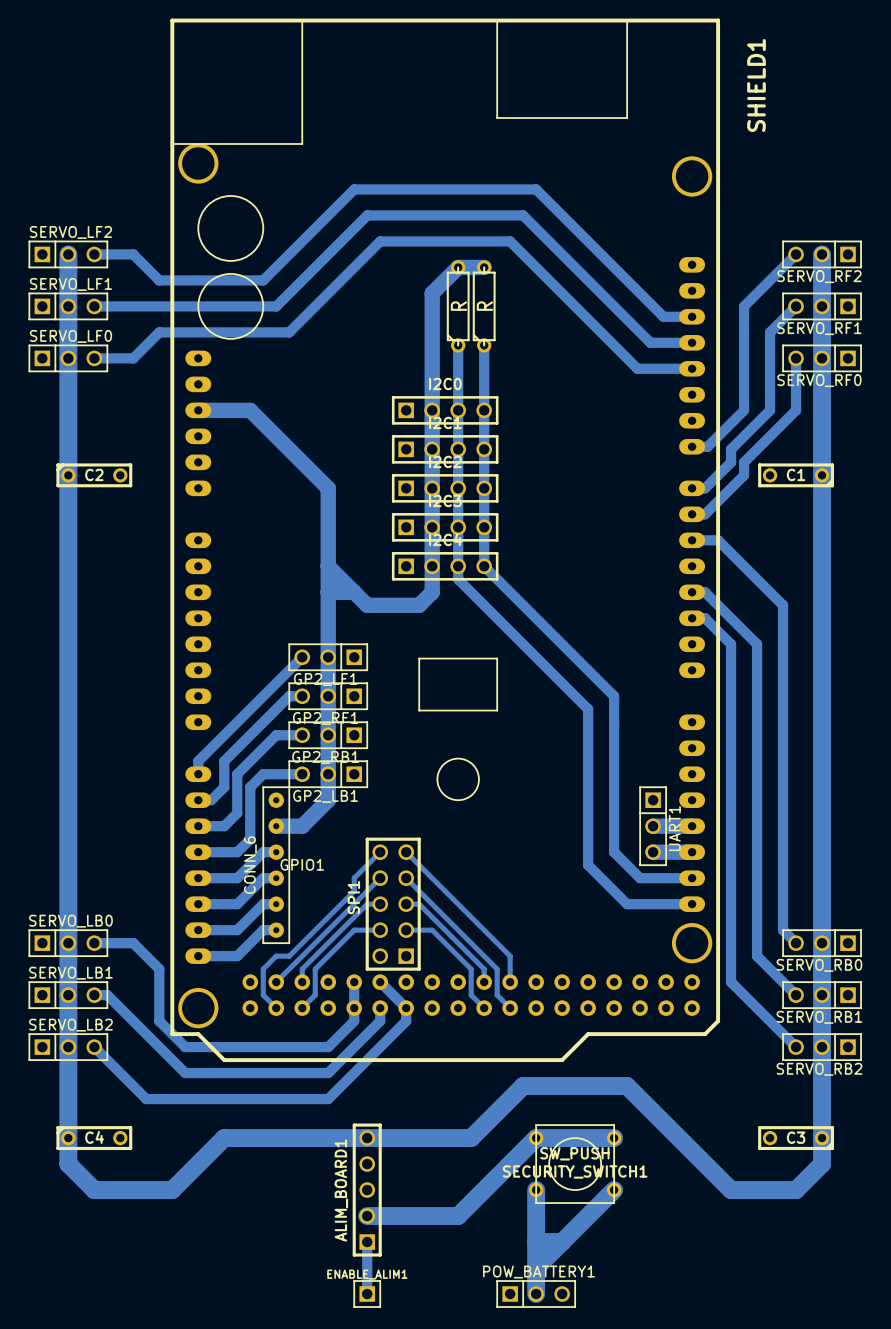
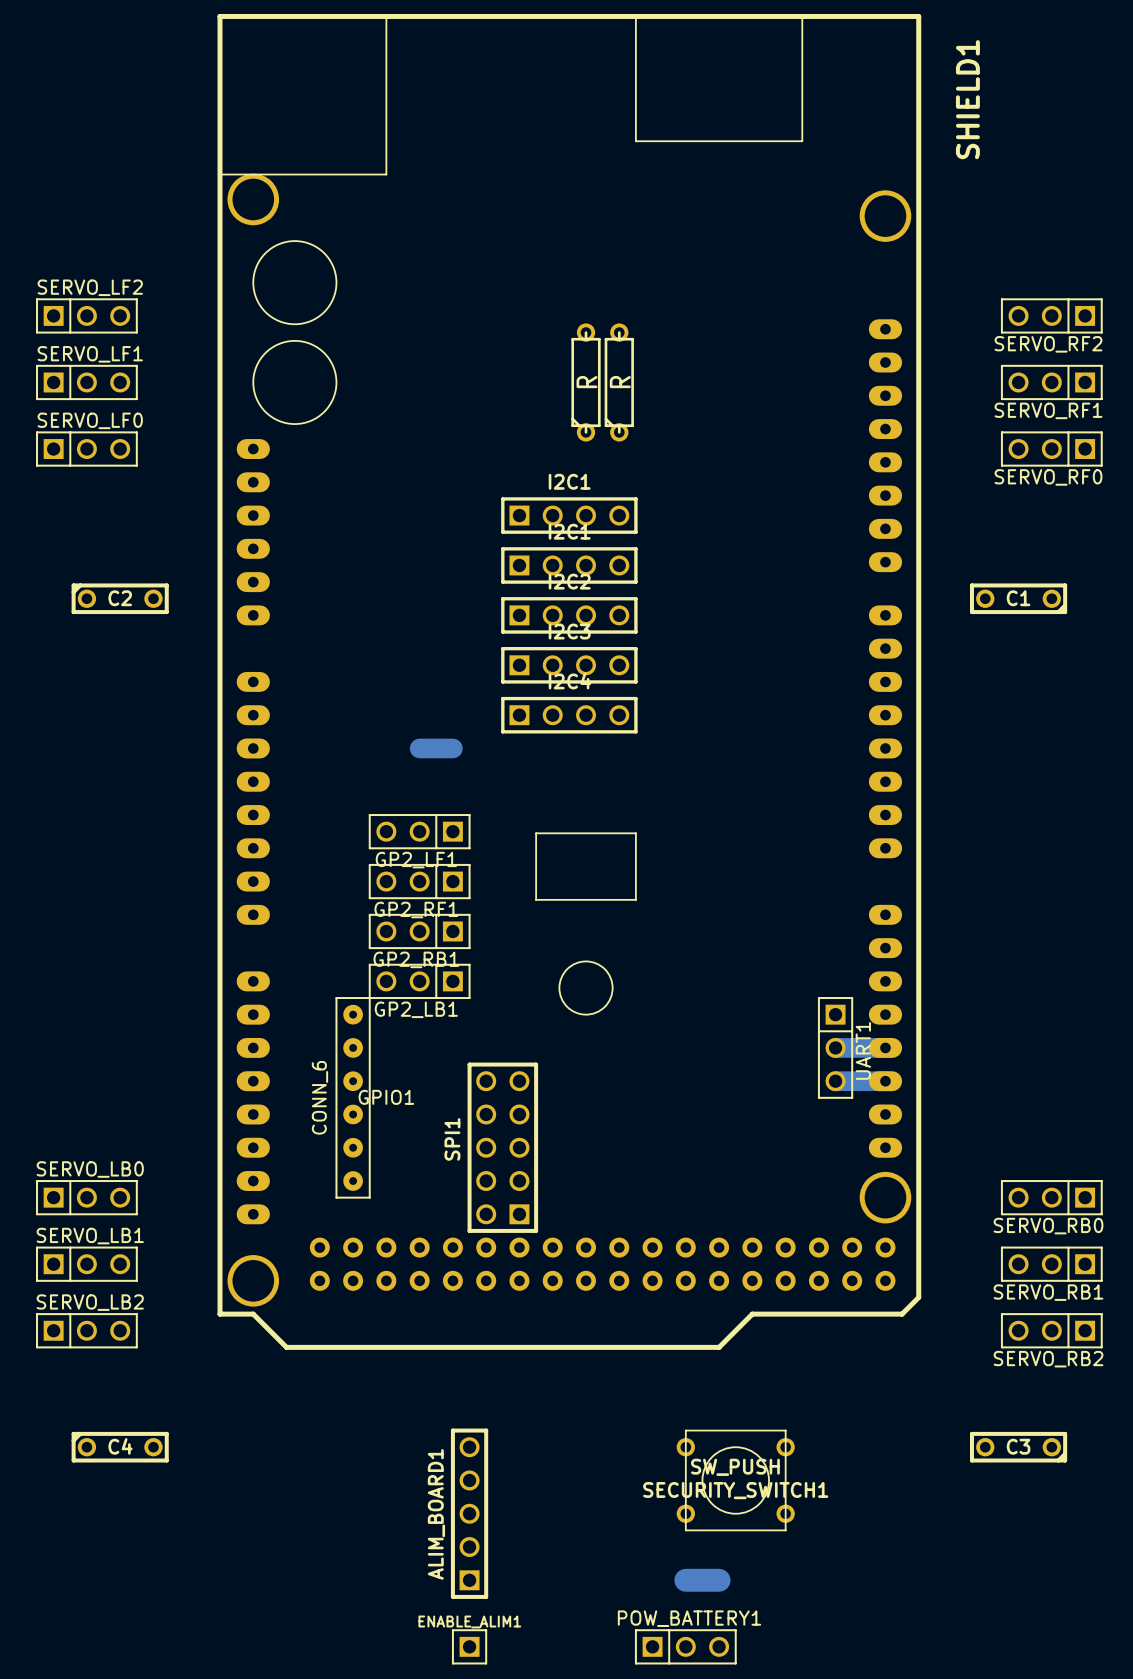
bottom track: (68, 254) (68, 1164) (94, 1190) (172, 1190) (224, 1138) (471, 1138) (523, 1086) (627, 1086) (731, 1190) (796, 1190) (822, 1164) (822, 254) -> none
bottom track: (94, 254) (133, 254) (159, 280) (263, 280) (354, 189) (536, 189) (663, 316) (692, 316) -> none
bottom track: (796, 254) (744, 306) (744, 410) (707, 446) (692, 446) -> none
bottom track: (484, 267) (458, 267) (432, 293) (432, 592) (419, 605) (367, 605) (328, 566) -> none
bottom track: (94, 306) (276, 306) (367, 215) (523, 215) (650, 342) (692, 342) -> none
bottom track: (796, 306) (770, 332) (770, 410) (731, 449) (731, 462) (705, 488) (692, 488) -> none
bottom track: (458, 345) (458, 579) (588, 709) (588, 865) (627, 904) (692, 904) -> none
bottom track: (484, 345) (484, 566) (614, 696) (614, 852) (640, 878) (692, 878) -> none
bottom track: (94, 358) (133, 358) (159, 332) (289, 332) (380, 241) (510, 241) (637, 368) (692, 368) -> none
bottom track: (796, 358) (796, 410) (744, 462) (744, 475) (705, 514) (692, 514) -> none
I2C0 name: I2C0 (445, 383) -> I2C1 (569, 481)
bottom track: (198, 410) (250, 410) (328, 488) (328, 800) (302, 826) (276, 826) -> none
bottom track: (692, 540) (718, 540) (783, 605) (783, 930) (796, 943) -> none
bottom track: (692, 592) (705, 592) (757, 644) (757, 956) (796, 995) -> none
bottom track: (692, 618) (705, 618) (731, 644) (731, 982) (796, 1047) -> none
bottom track: (302, 657) (198, 761) (198, 774) -> none
bottom track: (302, 696) (289, 696) (224, 761) (224, 787) (211, 800) (198, 800) -> none
bottom track: (302, 735) (276, 735) (237, 774) (237, 813) (224, 826) (198, 826) -> none
bottom track: (302, 774) (263, 774) (250, 787) (250, 839) (237, 852) (198, 852) -> none
bottom track: (276, 852) (263, 852) (237, 878) (198, 878) -> none
bottom track: (380, 852) (354, 878) (354, 891) (289, 956) (276, 956) (263, 969) (263, 995) (276, 1008) -> none
bottom track: (406, 852) (510, 956) (510, 982) -> none
bottom track: (276, 878) (263, 878) (237, 904) (198, 904) -> none
bottom track: (380, 878) (276, 982) -> none
bottom track: (406, 878) (497, 969) (497, 995) (510, 1008) -> none
bottom track: (276, 904) (263, 904) (237, 930) (198, 930) -> none
bottom track: (380, 904) (367, 904) (302, 969) (302, 982) -> none
bottom track: (406, 904) (419, 904) (484, 969) (484, 982) -> none
bottom track: (276, 930) (263, 930) (237, 956) (198, 956) -> none
bottom track: (380, 930) (354, 930) (315, 969) (315, 995) (302, 1008) -> none
bottom track: (406, 930) (432, 930) (471, 969) (471, 995) (484, 1008) -> none
bottom track: (94, 943) (133, 943) (159, 969) (159, 1021) (185, 1047) (328, 1047) (354, 1021) (354, 982) -> none
bottom track: (380, 982) (406, 1008) (406, 1021) (328, 1099) (146, 1099) (94, 1047) -> none
bottom track: (94, 995) (107, 995) (185, 1073) (328, 1073) (380, 1021) (380, 1008) -> none
bottom track: (614, 1138) (536, 1138) (458, 1216) (367, 1216) -> none
bottom track: (536, 1190) (536, 1294) -> none
bottom track: (614, 1190) (536, 1268) -> none
bottom track: (367, 1242) (367, 1294) -> none

